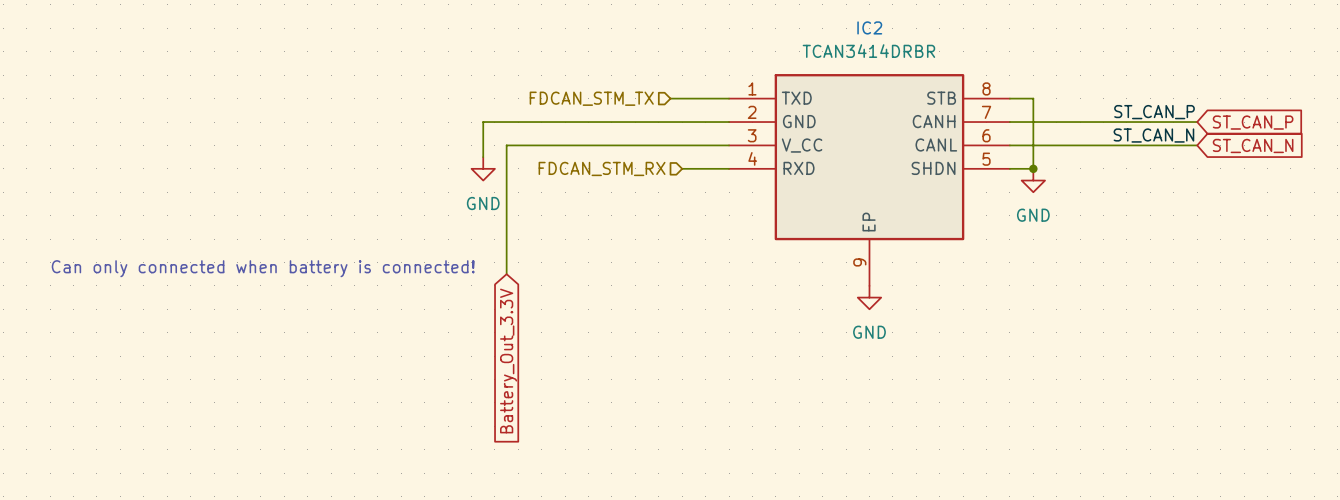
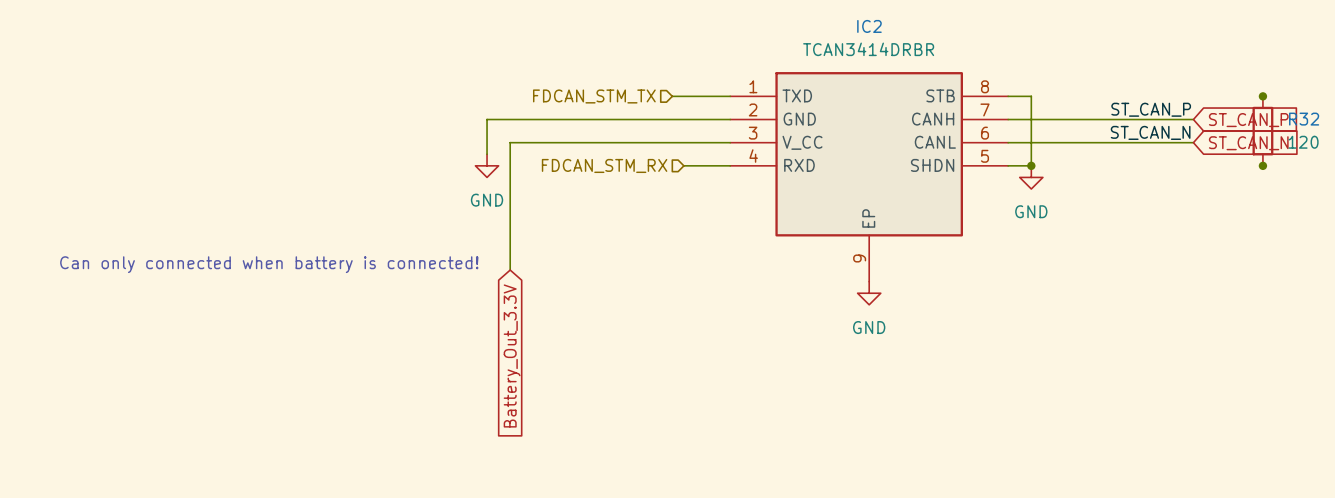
junction: none -> (1262, 96)
R32: none -> 120 (1262, 131)
junction: none -> (1262, 165)

